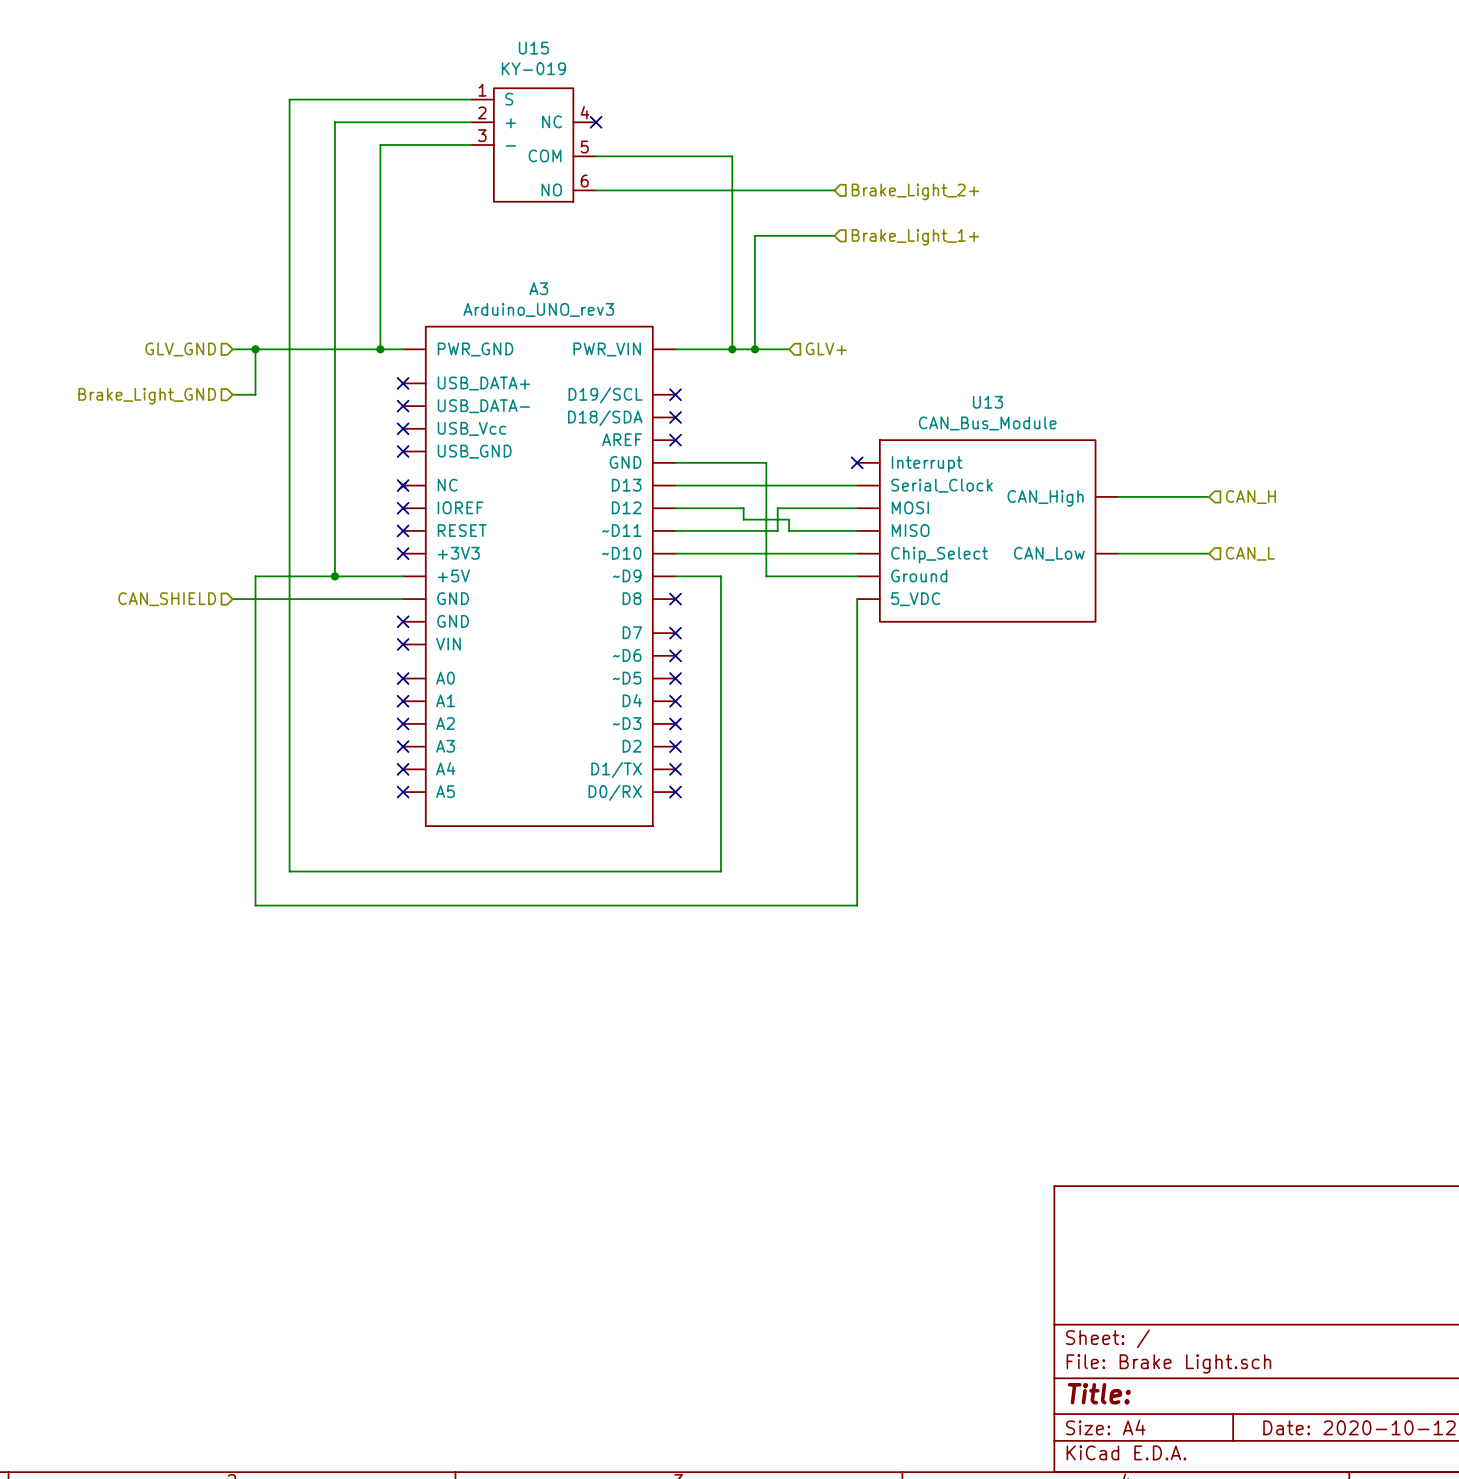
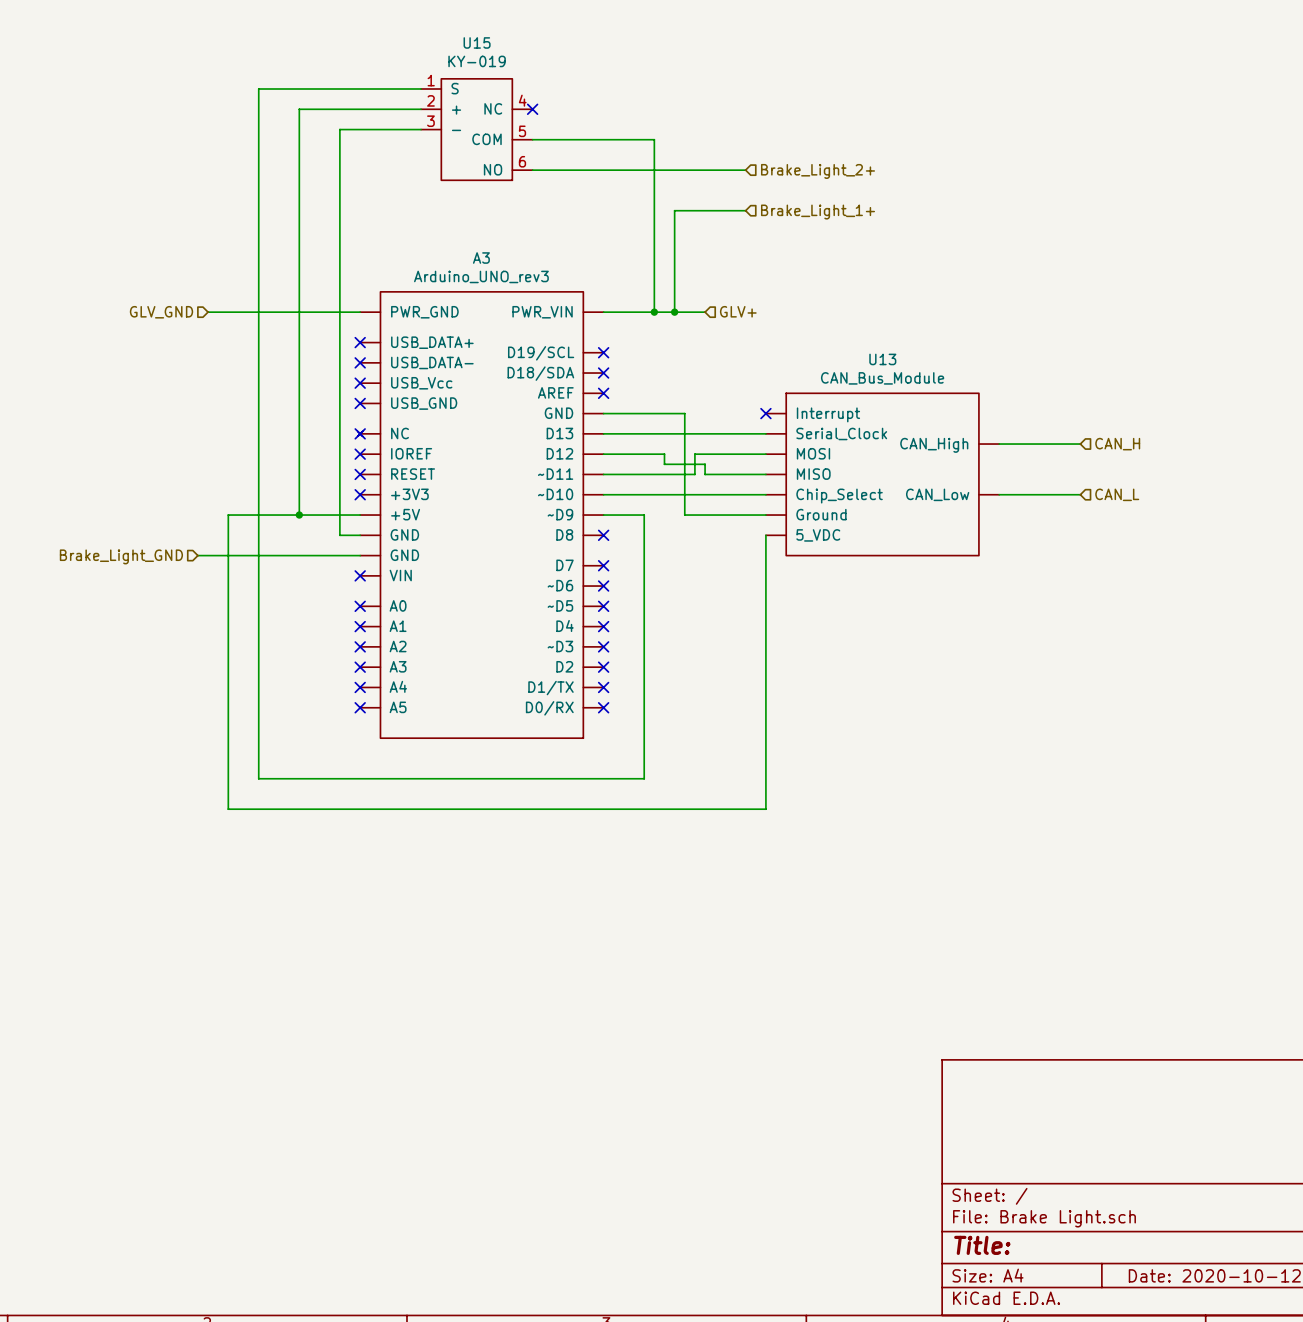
wire: (255, 349) (255, 394) (232, 394) -> none
junction: (255, 349) -> none
junction: (380, 349) -> none
hierarchical label: Brake_Light_GND (147, 396) -> none
hierarchical label: CAN_SHIELD (167, 599) -> none
wire: (232, 599) (380, 599) -> (339, 312) (339, 535)
wire: none -> (197, 555) (360, 555)
no-connect mark: (403, 621) -> none
hierarchical label: none -> Brake_Light_GND (121, 556)

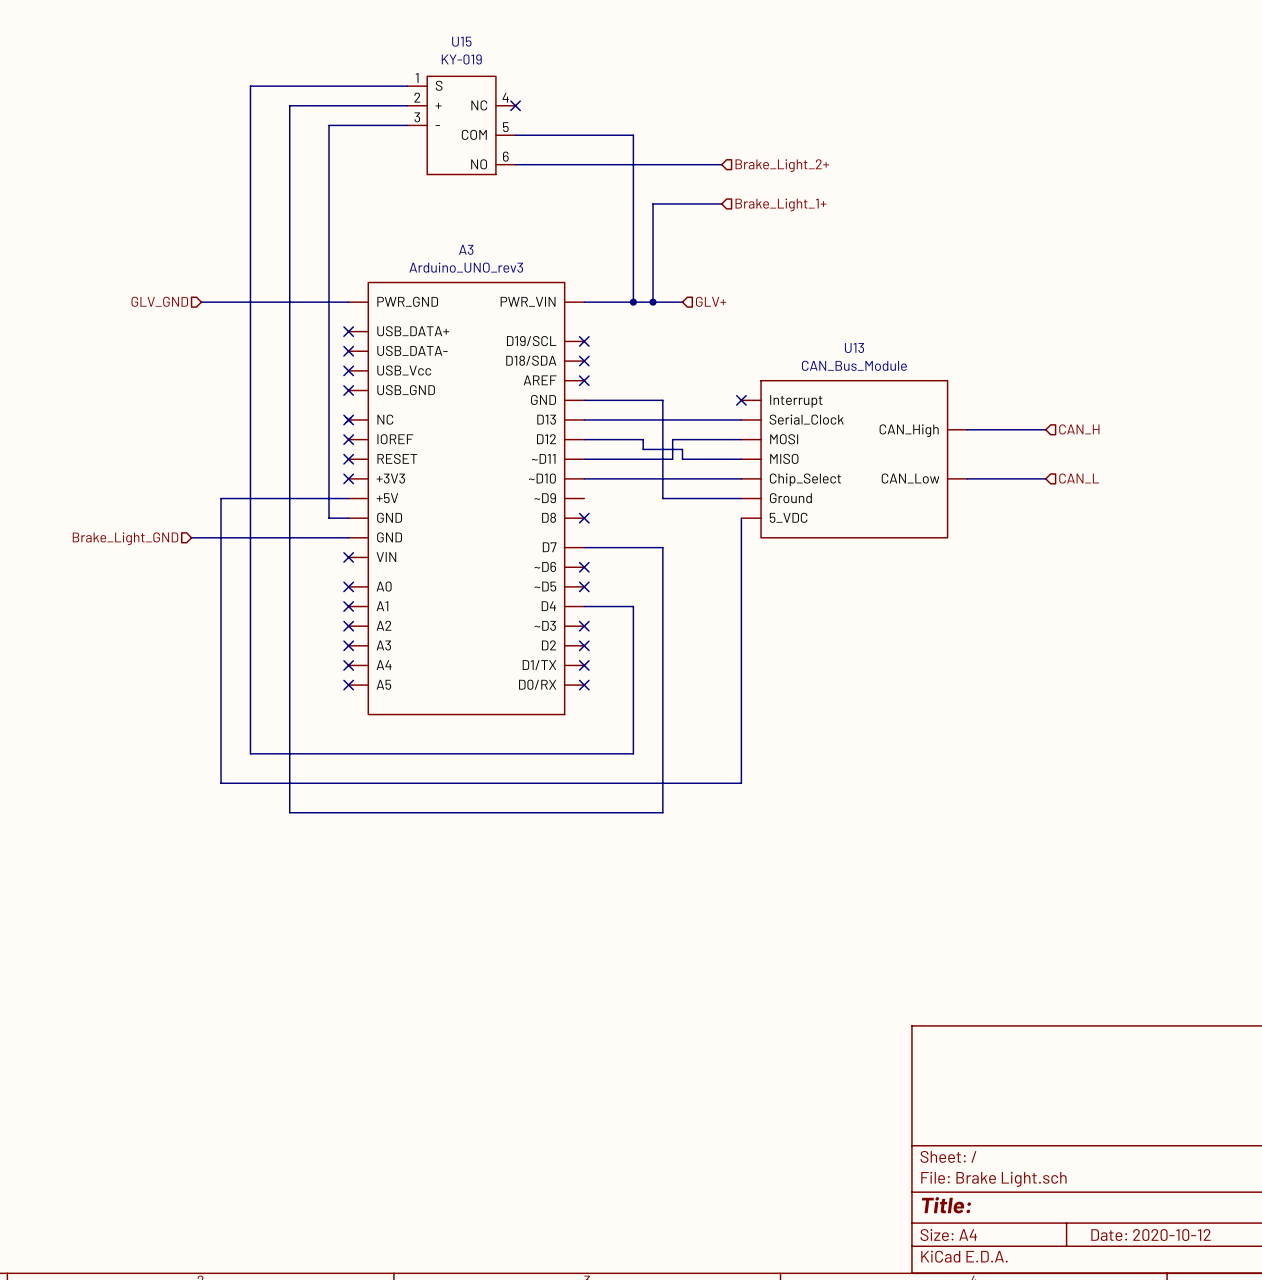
wire: none -> (289, 498) (289, 812) (662, 812) (662, 547) (584, 547)
junction: (299, 515) -> none
wire: (603, 515) (644, 515) (644, 778) -> (584, 606) (633, 606) (633, 753) (623, 753)
no-connect mark: (603, 565) -> none
no-connect mark: (603, 626) -> none

